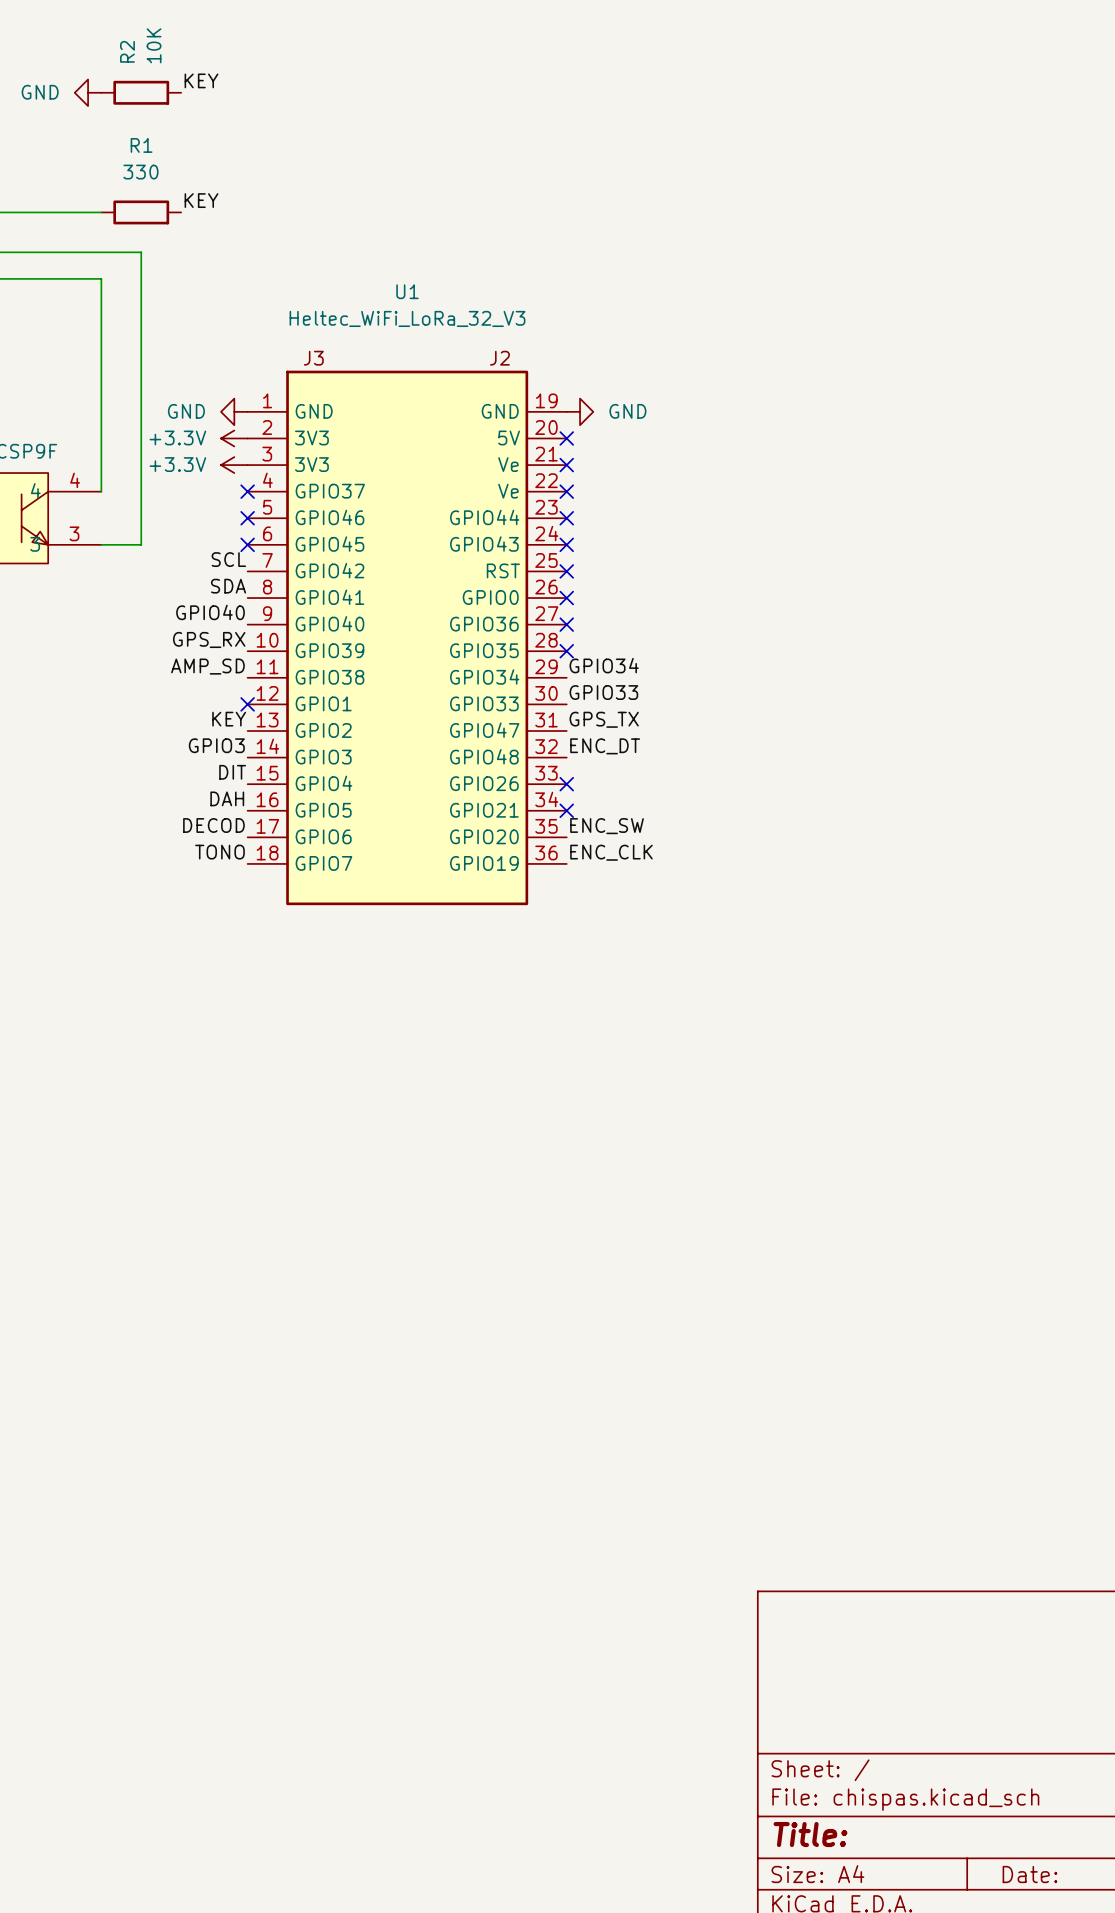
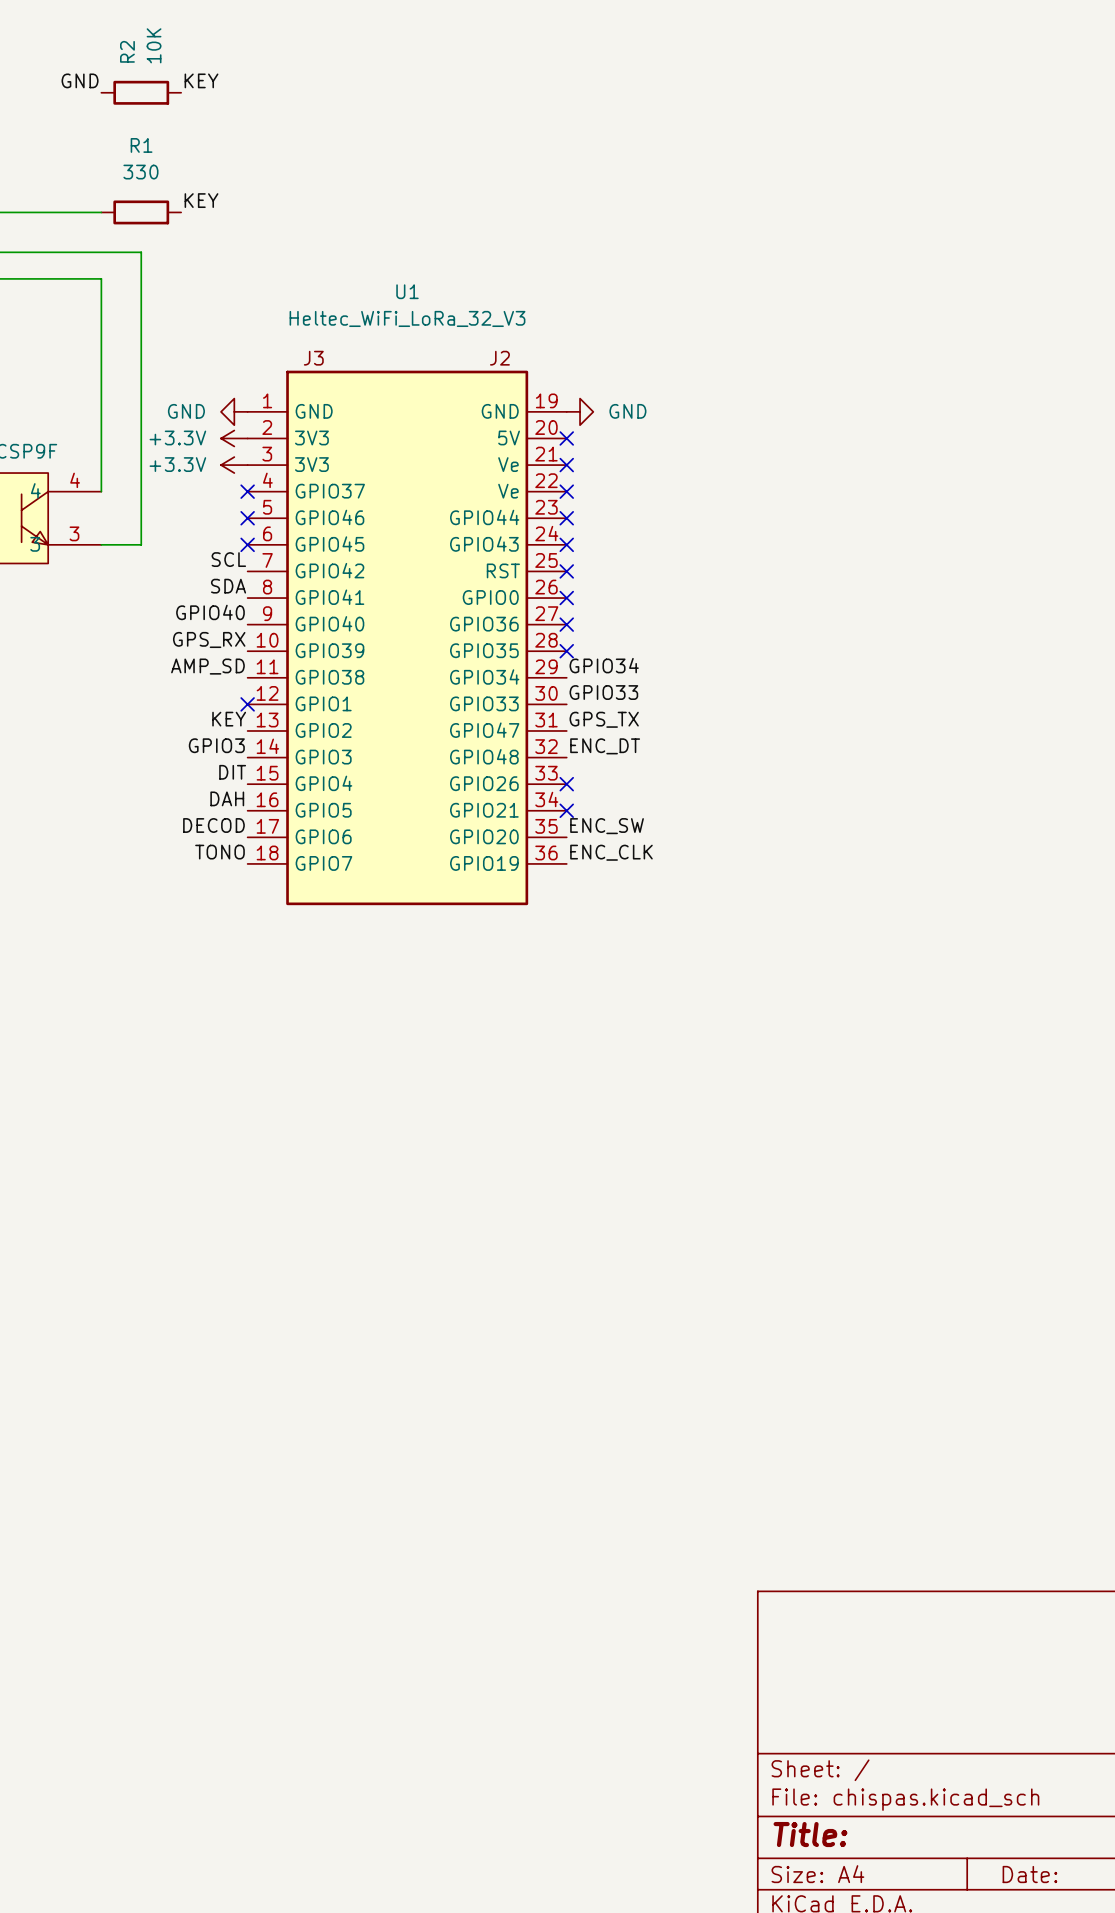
label: none -> GND (80, 80)
power symbol: GND (88, 92) -> none

